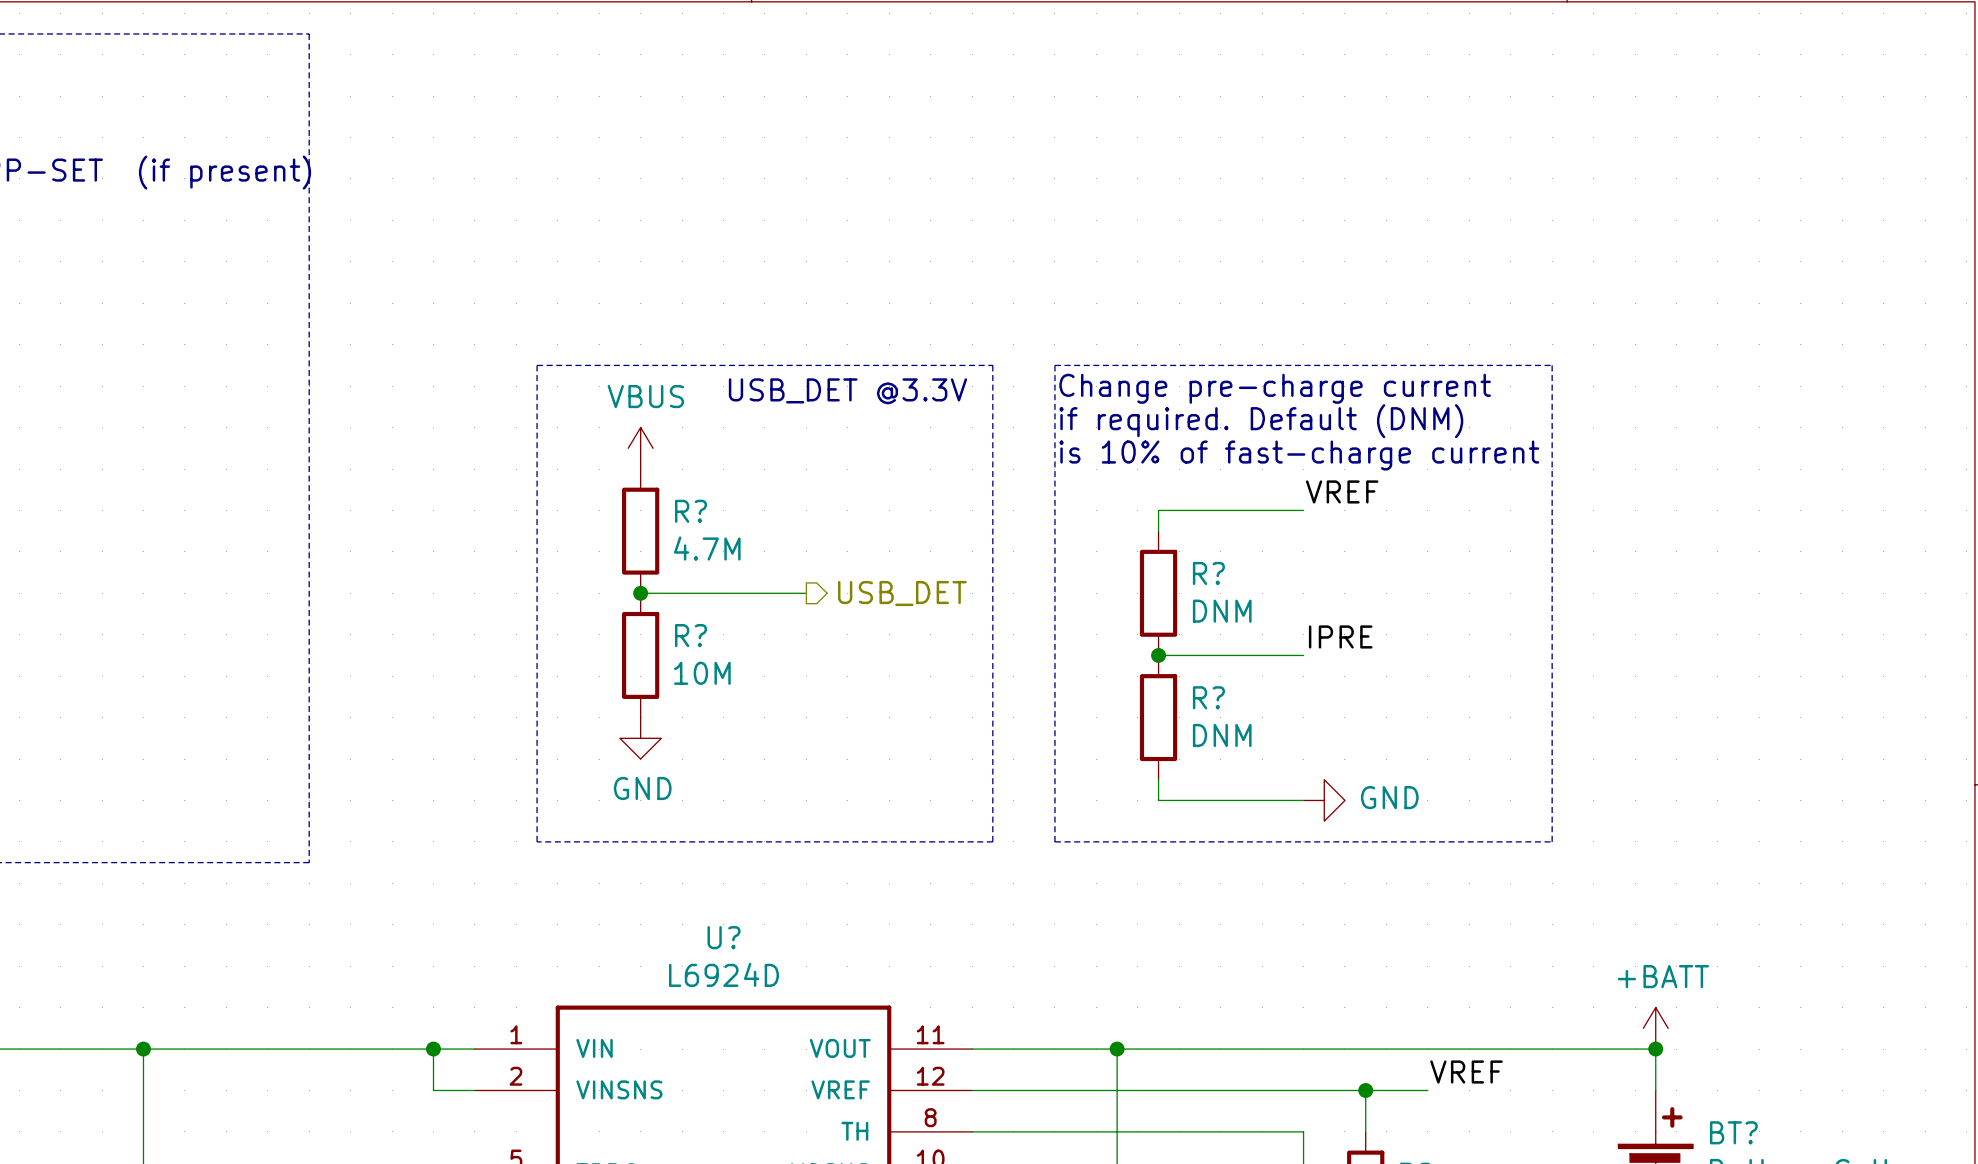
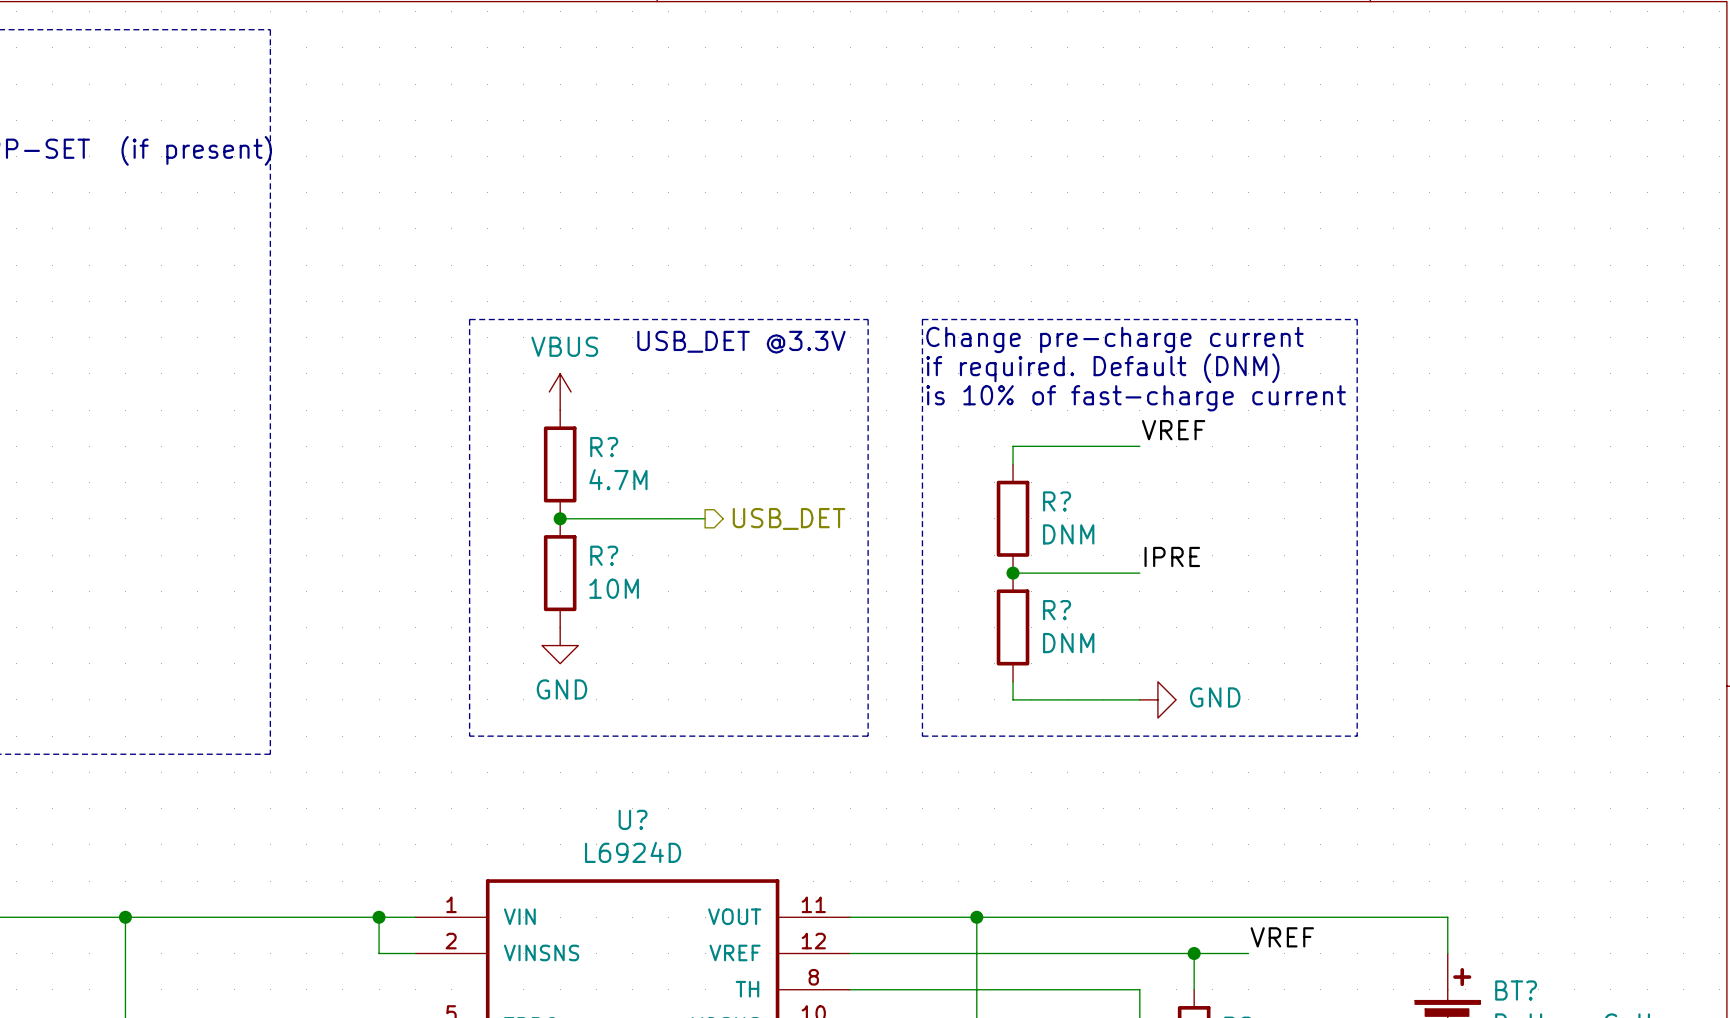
power symbol: +BATT (1655, 1028) -> none
junction: (1655, 1049) -> none

